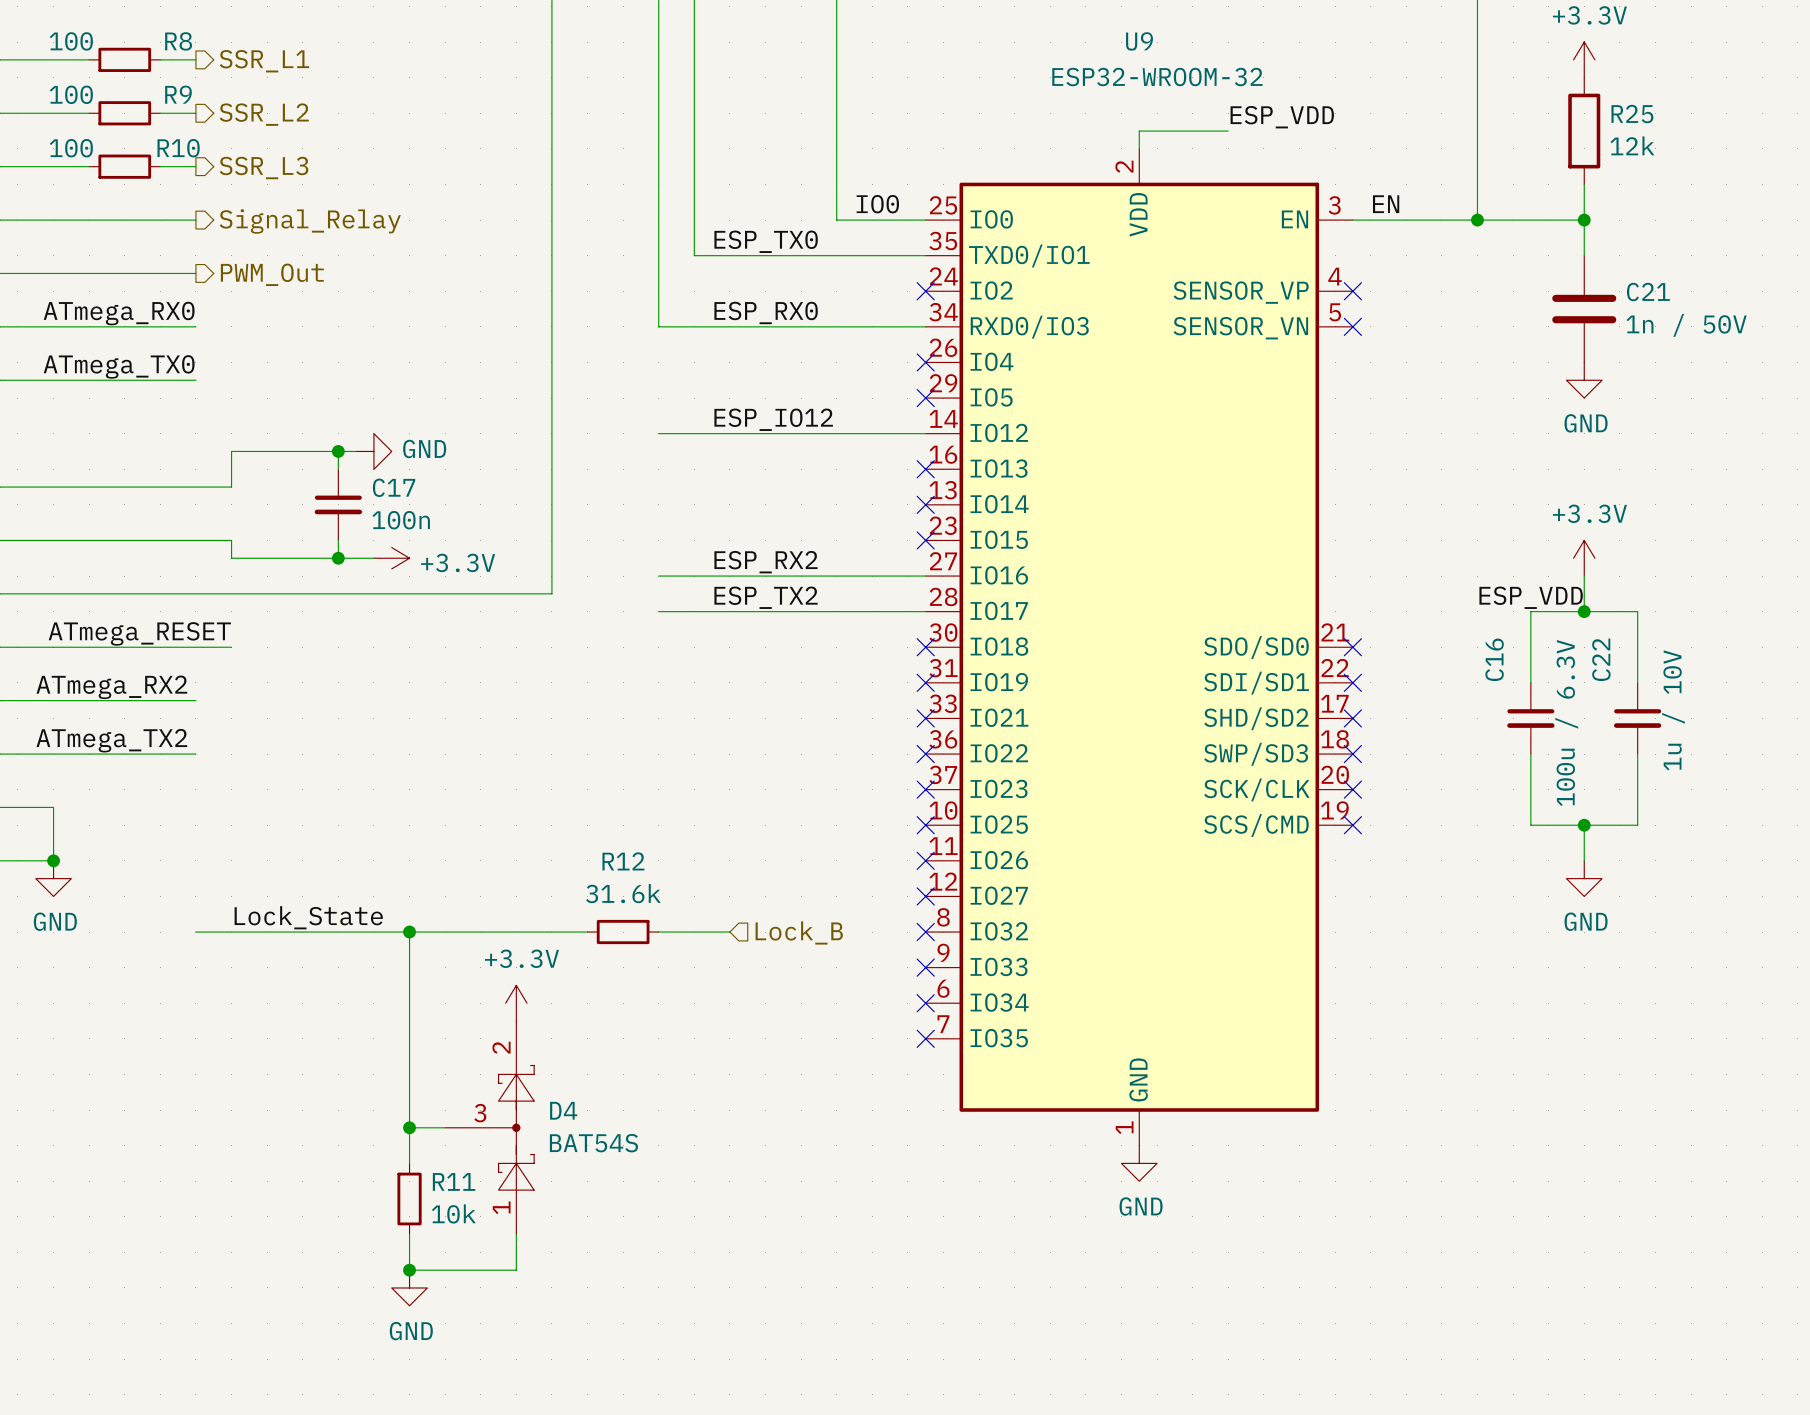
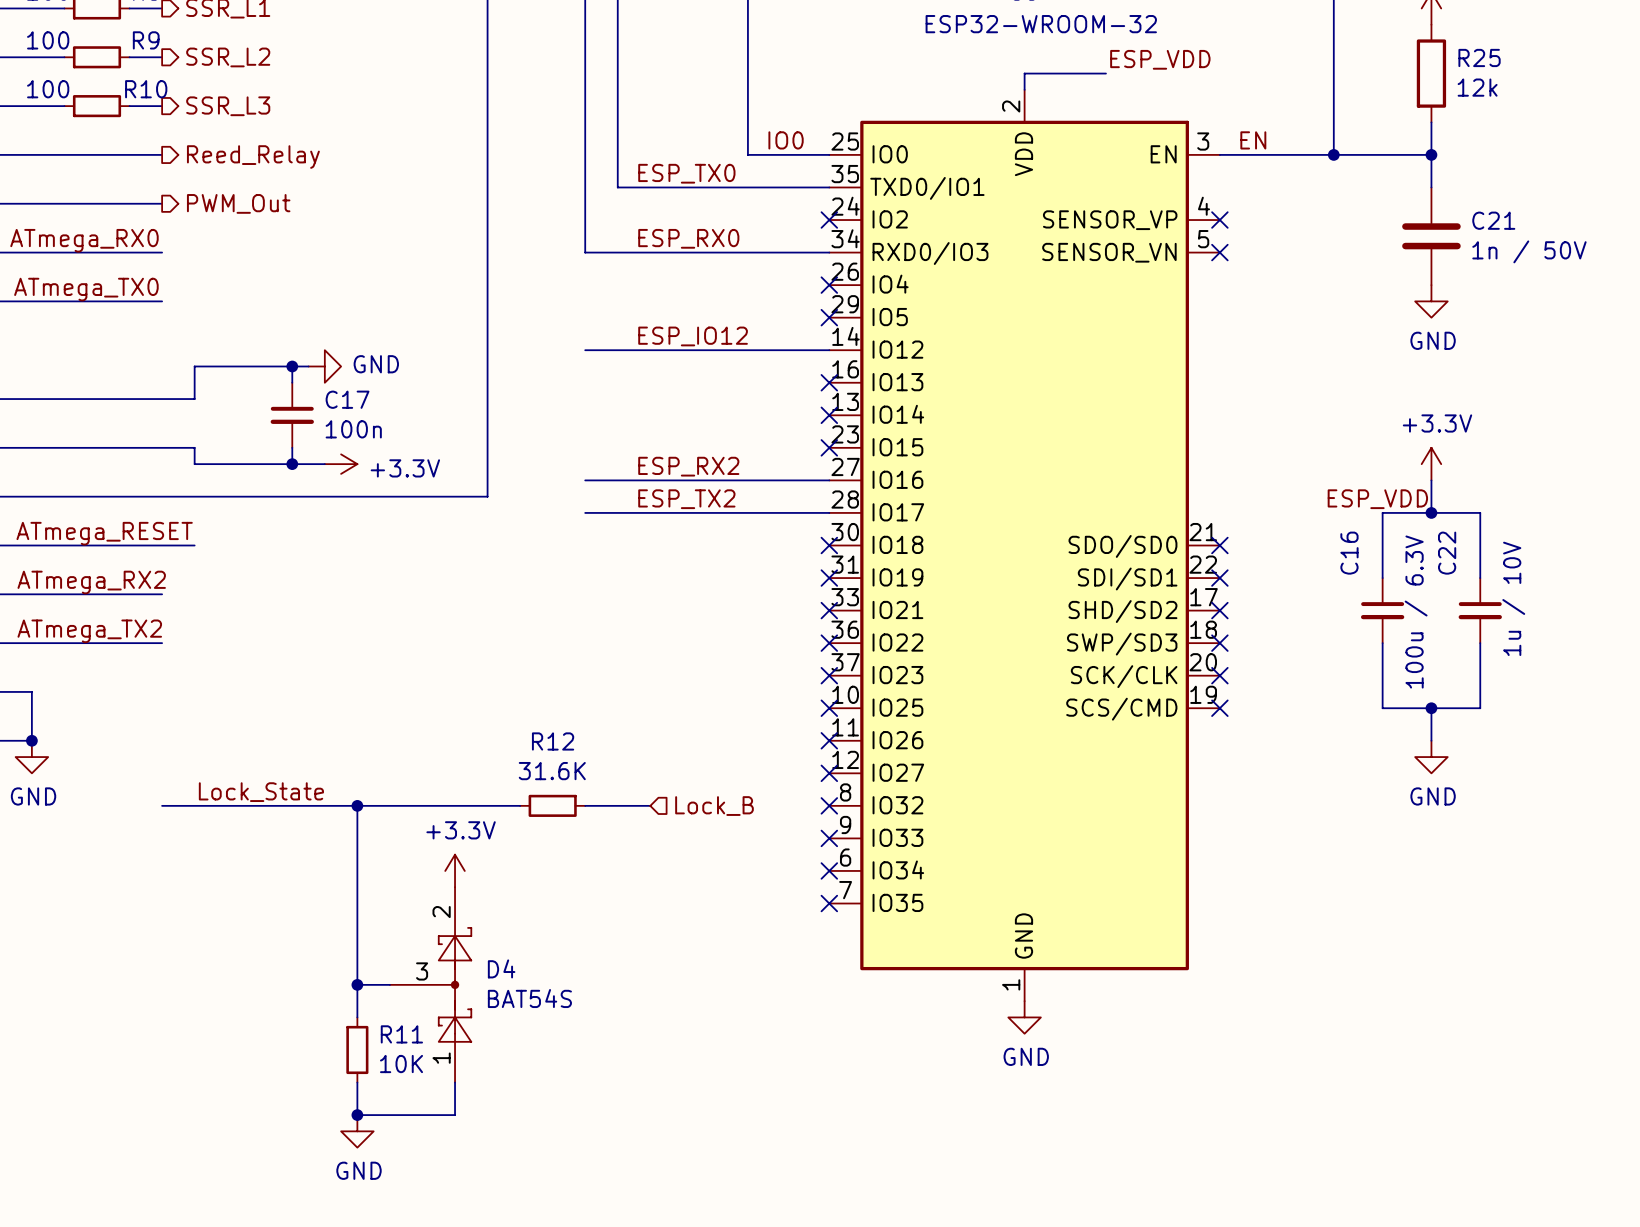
hierarchical label: Signal_Relay (310, 221) -> Reed_Relay (253, 157)
R12 value: 31.6k (623, 893) -> 31.6K (552, 771)
R11 value: 10k (453, 1213) -> 10K (401, 1064)

